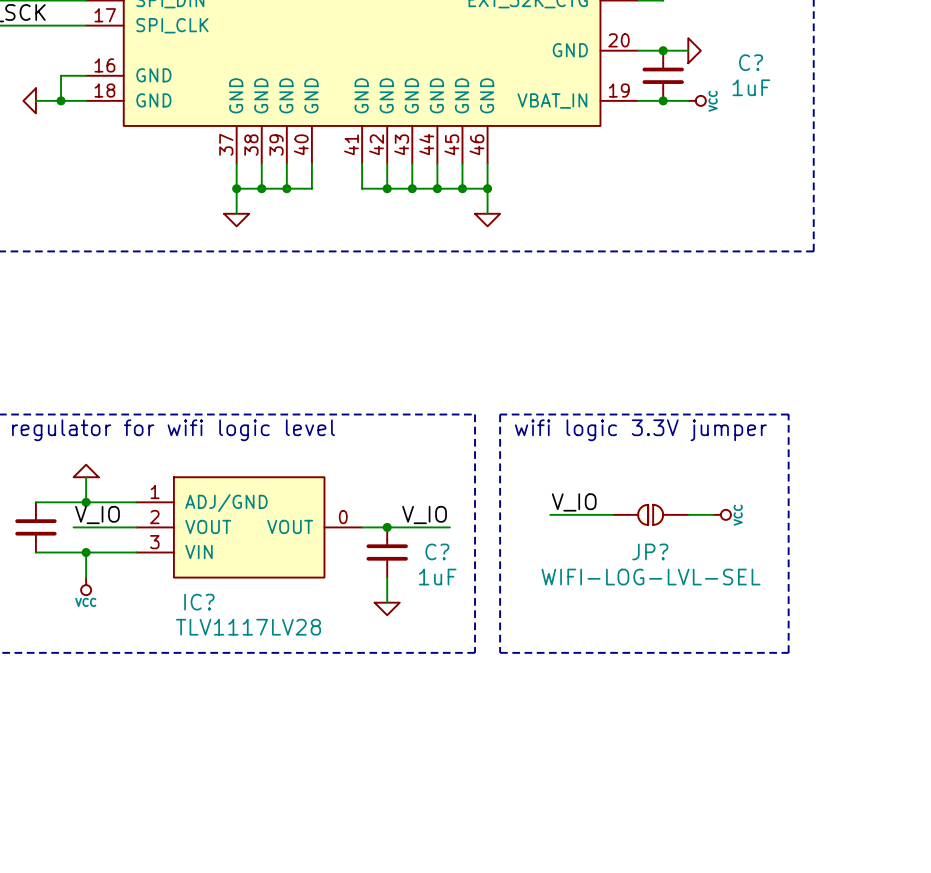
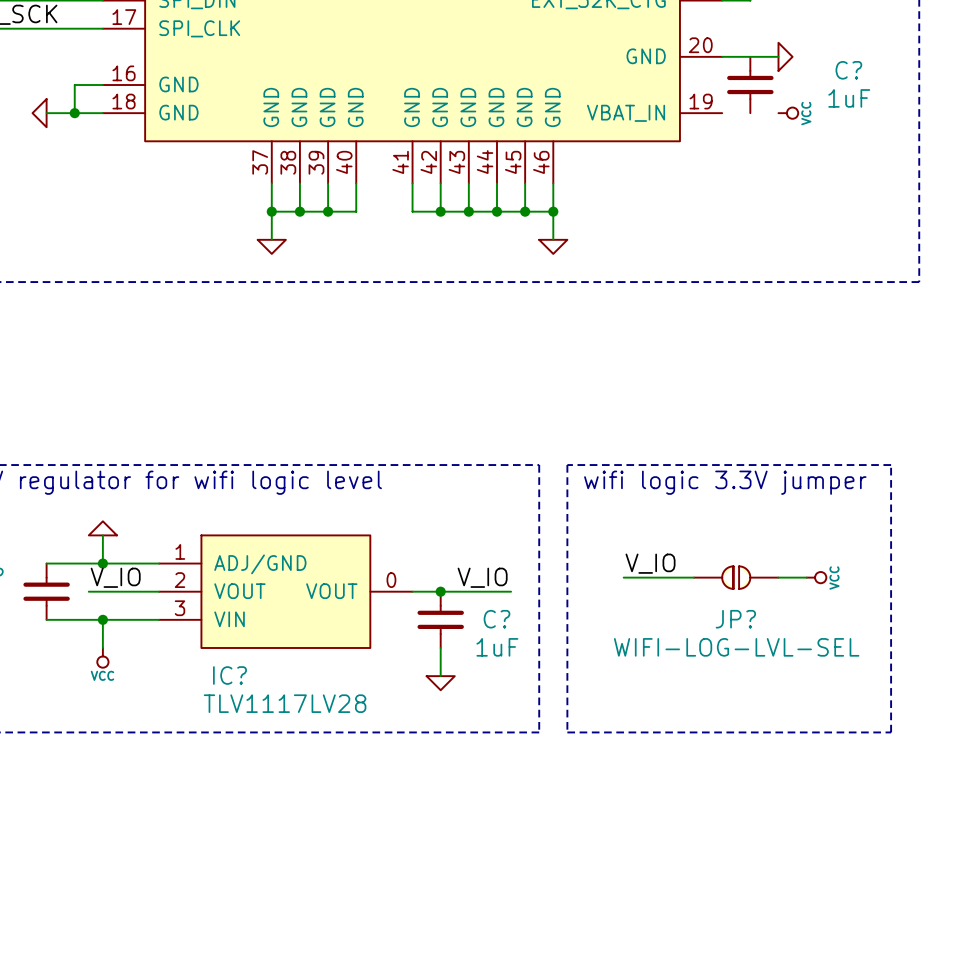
junction: (663, 50) -> none
wire: (638, 100) (688, 100) -> none
junction: (663, 100) -> none

